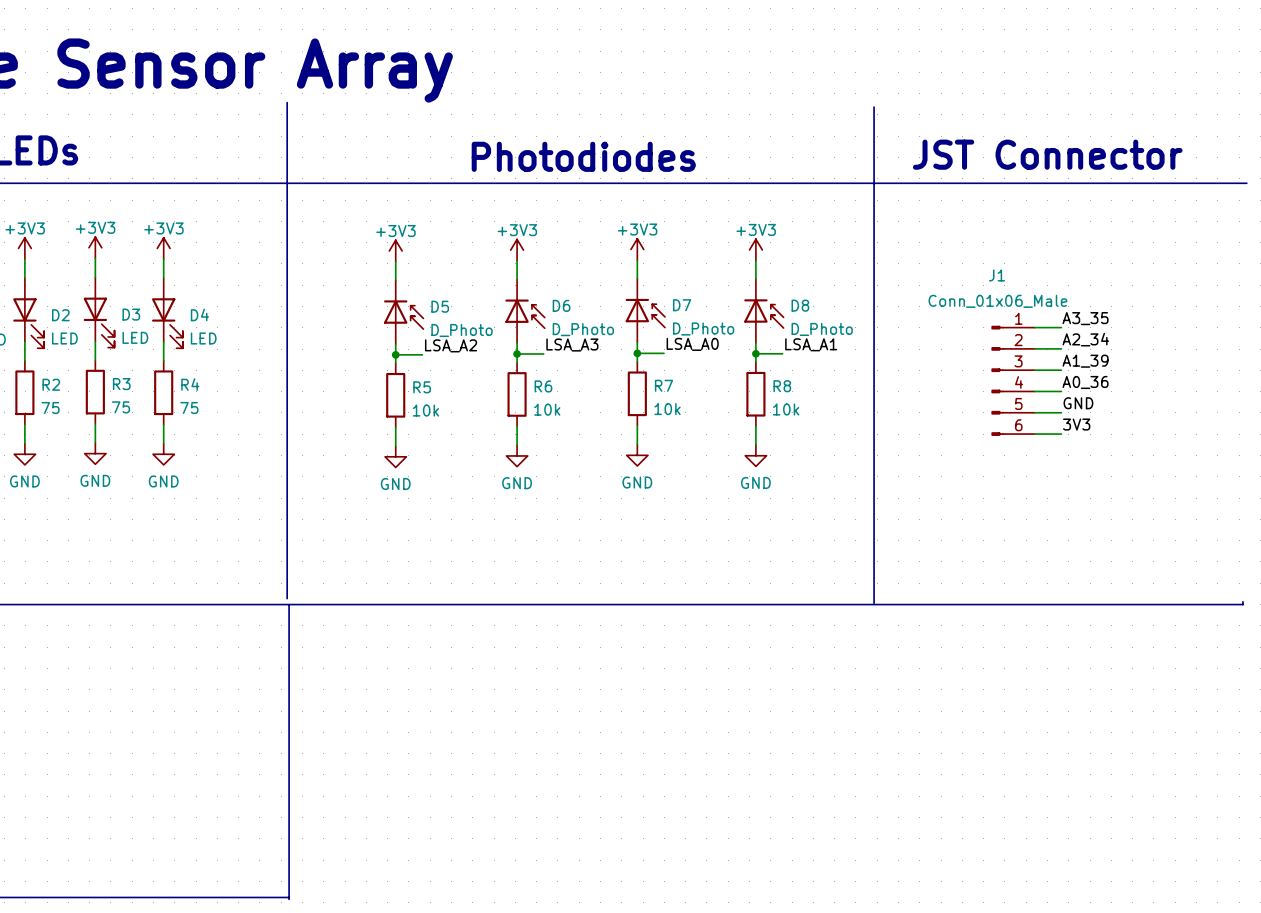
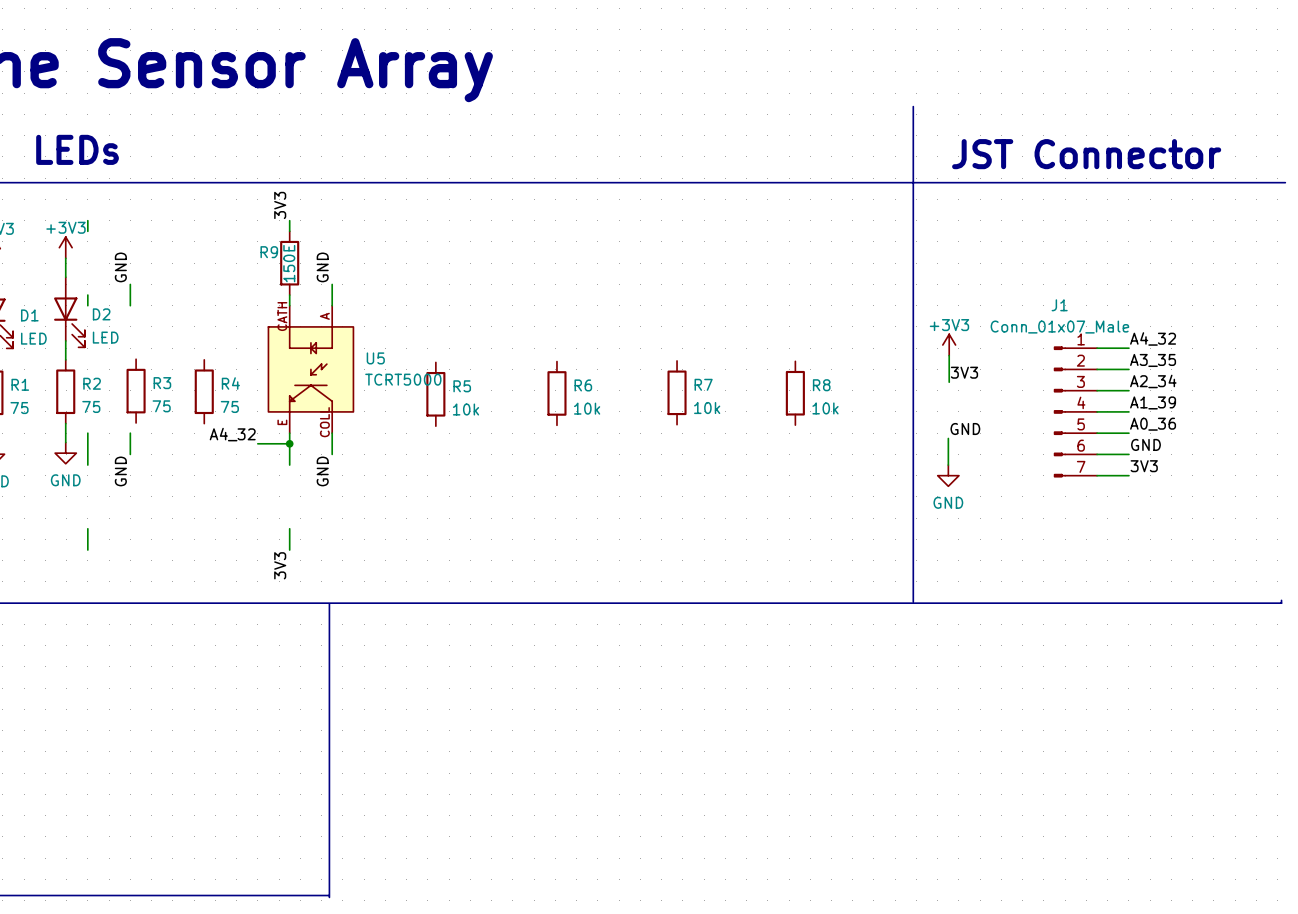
line: (287, 102) (287, 598) -> none
text: Photodiodes (583, 156) -> none
label: none -> 3V3 (280, 205)
wire: none -> (87, 220) (87, 231)
wire: none -> (289, 220) (289, 231)
power symbol: +3V3 (95, 247) -> none
power symbol: +3V3 (163, 248) -> none
power symbol: +3V3 (637, 249) -> none
power symbol: +3V3 (755, 249) -> none
power symbol: +3V3 (395, 250) -> none
power symbol: +3V3 (517, 250) -> none
wire: (95, 258) (95, 277) -> none
wire: (163, 259) (163, 278) -> none
wire: (517, 260) (517, 279) -> none
wire: (637, 260) (637, 278) -> none
wire: (755, 260) (755, 279) -> none
wire: (395, 261) (395, 280) -> none
R9: none -> 150E (289, 263)
label: none -> GND (120, 267)
label: none -> GND (322, 267)
wire: none -> (130, 284) (130, 305)
wire: none -> (332, 284) (332, 305)
wire: none -> (87, 295) (87, 305)
wire: none -> (289, 295) (289, 305)
J1 value: Conn_01x06_Male (997, 301) -> Conn_01x07_Male (1059, 327)
D7: D_Photo (645, 310) -> none
D6: D_Photo (525, 311) -> none
D8: D_Photo (763, 311) -> none
D3: LED (99, 312) -> none
D5: D_Photo (403, 312) -> none
D4: LED (167, 313) -> none
label position: A3_35 (1085, 318) -> A3_35 (1153, 360)
J1 symbol: [991, 325, 1035, 436] -> [1053, 346, 1098, 478]
wire: (1034, 327) (1061, 327) -> none
label position: A2_34 (1085, 339) -> A2_34 (1153, 381)
label: none -> A4_32 (1153, 338)
wire: (95, 341) (95, 360) -> none
wire: (163, 341) (163, 360) -> none
wire: (637, 342) (637, 361) -> none
wire: (755, 342) (755, 362) -> none
wire: (517, 343) (517, 362) -> none
wire: (395, 344) (395, 363) -> none
label: LSA_A0 (692, 344) -> none
label: LSA_A1 (811, 344) -> none
label: LSA_A2 (451, 345) -> none
label: LSA_A3 (572, 345) -> none
power symbol: none -> +3V3 (949, 345)
wire: none -> (1097, 348) (1128, 348)
wire: (637, 353) (663, 353) -> none
junction: (637, 353) -> none
wire: (755, 353) (782, 353) -> none
junction: (755, 353) -> none
wire: (395, 354) (422, 354) -> none
junction: (395, 354) -> none
wire: (517, 354) (543, 354) -> none
junction: (517, 354) -> none
wire: none -> (949, 355) (949, 382)
label position: A1_39 (1085, 361) -> A1_39 (1153, 402)
U5: none -> TCRT5000 (310, 369)
wire: none -> (1097, 369) (1128, 369)
label: none -> 3V3 (964, 372)
label position: A0_36 (1085, 382) -> A0_36 (1153, 424)
wire: none -> (1097, 390) (1128, 390)
label position: GND (1078, 403) -> GND (1145, 444)
wire: none -> (1097, 411) (1128, 411)
wire: (95, 424) (95, 442) -> none
wire: (163, 424) (163, 443) -> none
label position: 3V3 (1076, 424) -> 3V3 (1144, 466)
wire: (637, 425) (637, 444) -> none
wire: (517, 426) (517, 445) -> none
wire: (755, 426) (755, 445) -> none
wire: (395, 427) (395, 446) -> none
label: none -> GND (965, 429)
wire: none -> (87, 433) (87, 465)
wire: none -> (130, 433) (130, 454)
wire: none -> (289, 433) (289, 465)
wire: none -> (332, 433) (332, 454)
wire: none -> (1097, 433) (1128, 433)
label: none -> A4_32 (232, 434)
wire: none -> (948, 438) (948, 465)
wire: none -> (257, 443) (289, 443)
junction: none -> (289, 443)
power symbol: GND (95, 453) -> none
power symbol: GND (163, 454) -> none
power symbol: GND (517, 455) -> none
power symbol: GND (637, 455) -> none
power symbol: GND (755, 455) -> none
wire: none -> (1097, 454) (1128, 454)
power symbol: GND (395, 456) -> none
label: none -> GND (120, 471)
label: none -> GND (322, 471)
power symbol: none -> GND (948, 475)
wire: none -> (1097, 475) (1128, 475)
wire: none -> (87, 528) (87, 550)
wire: none -> (289, 528) (289, 550)
label: none -> 3V3 (280, 565)

